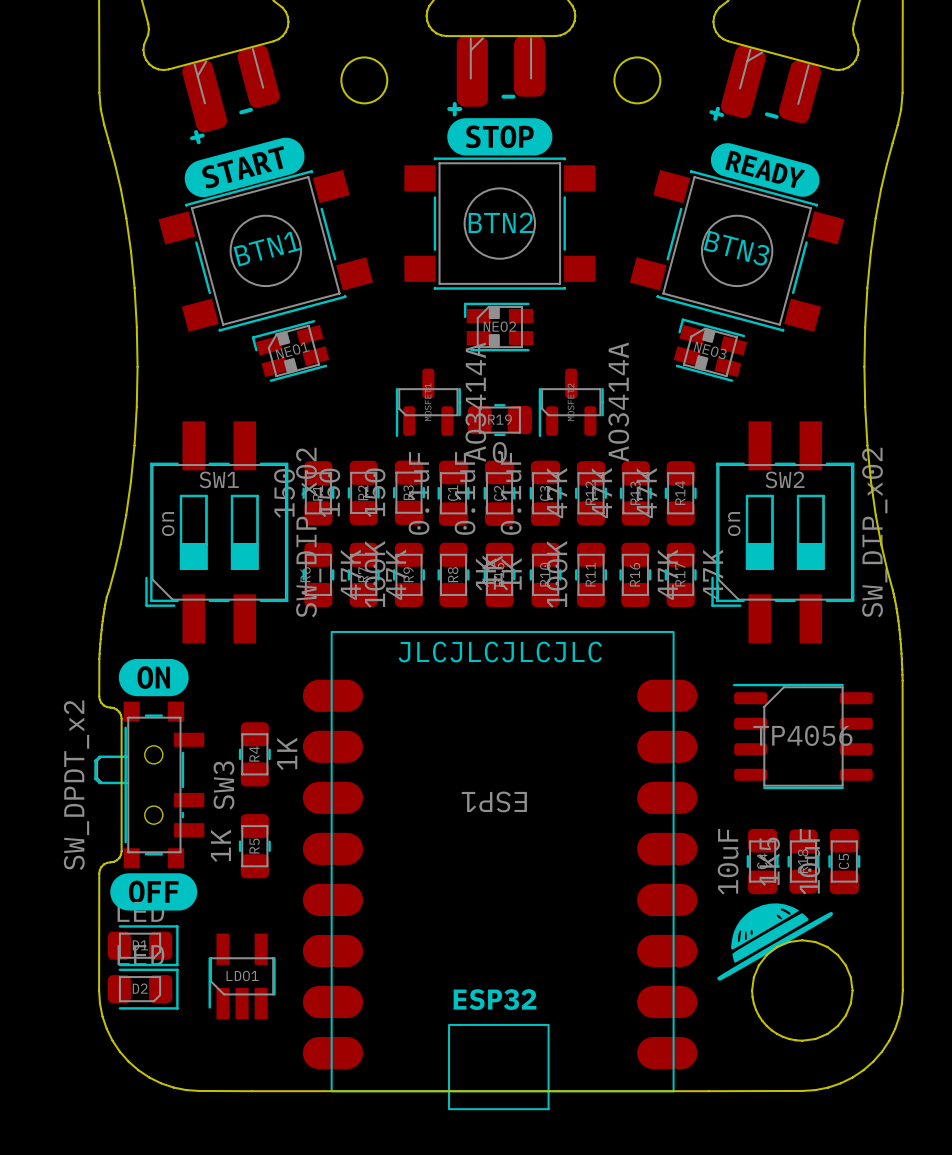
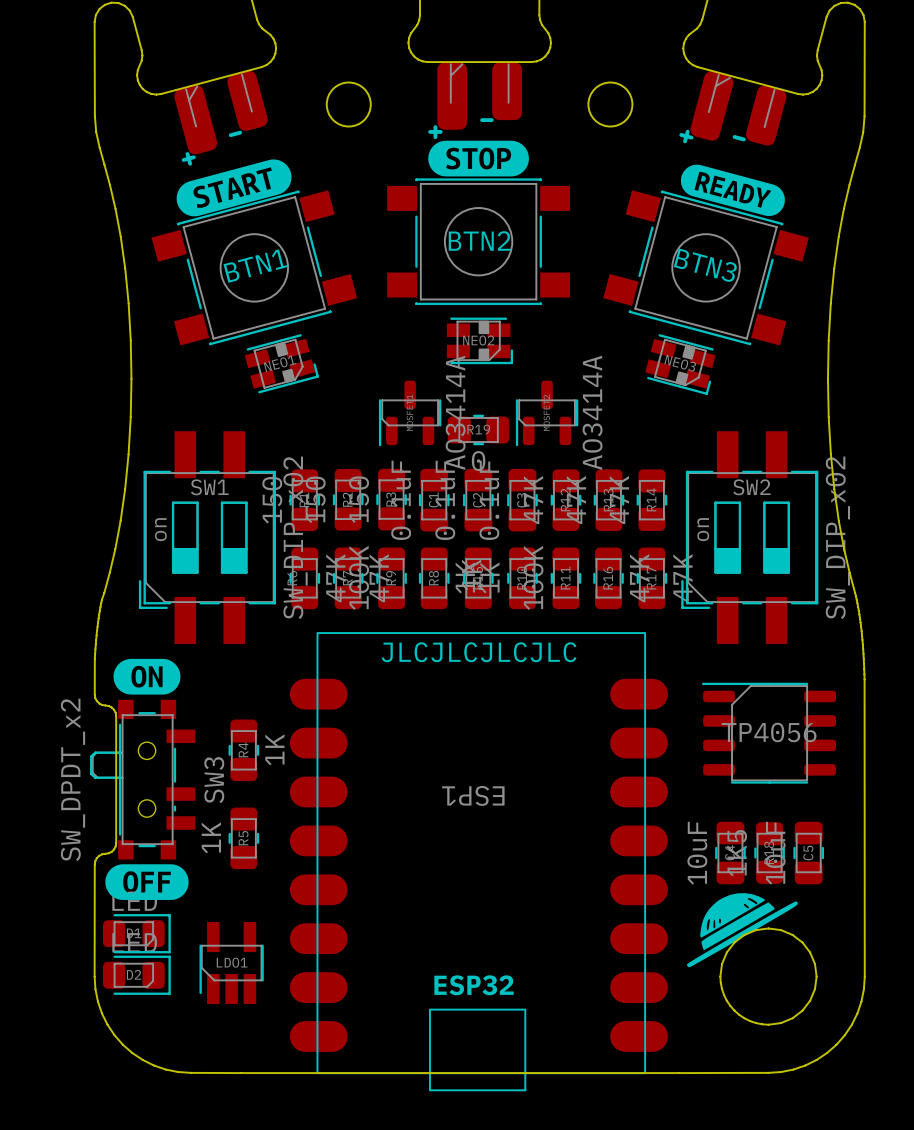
NEO2 rotation: 0° (498, 327) -> 180° (479, 340)
NEO1 rotation: 0° (290, 350) -> 180° (281, 363)
NEO3 rotation: 0° (710, 350) -> 180° (680, 364)

